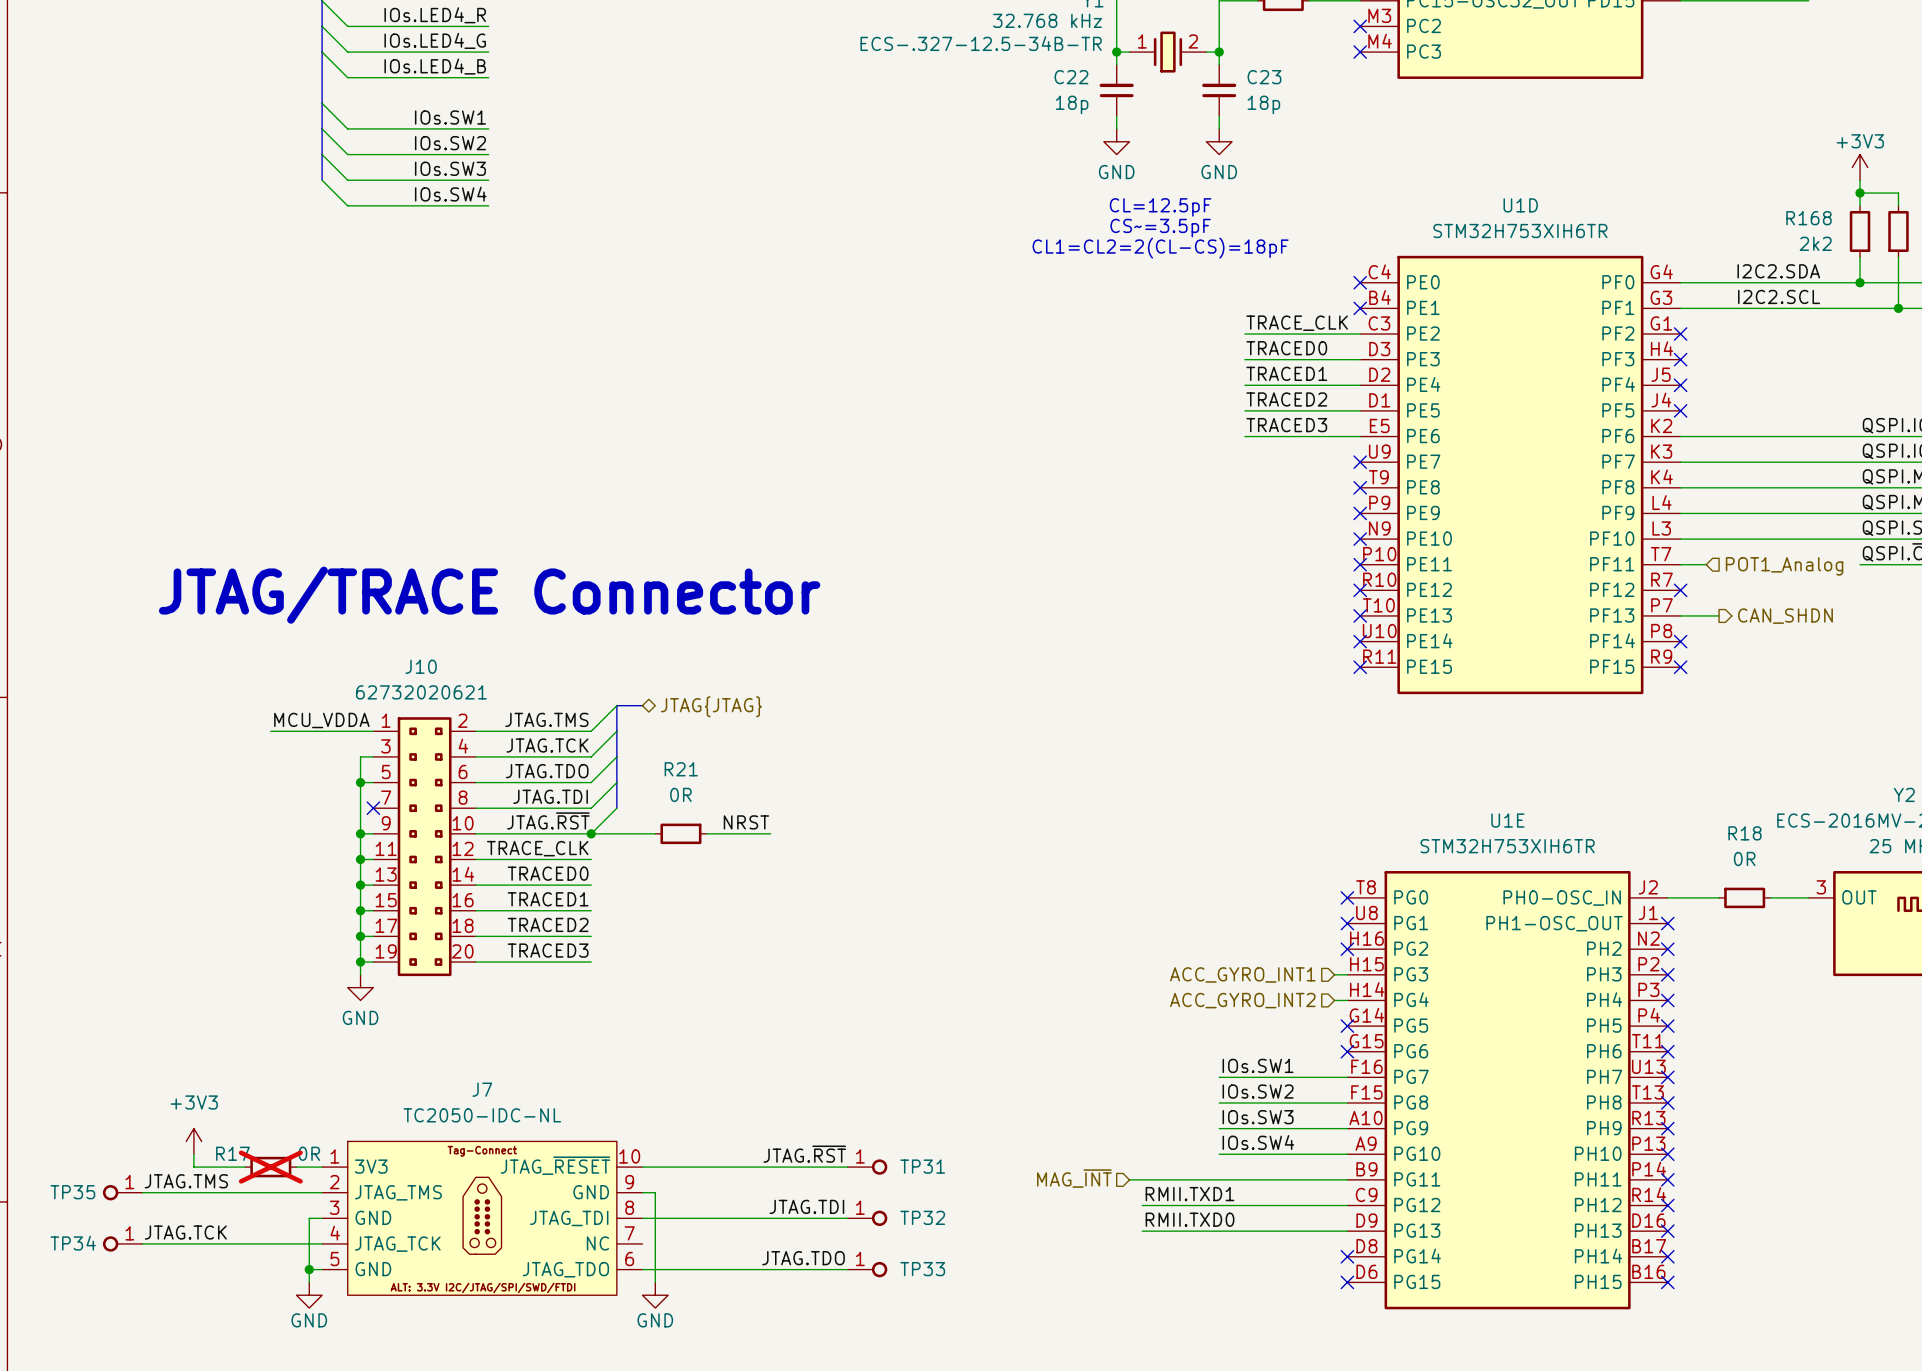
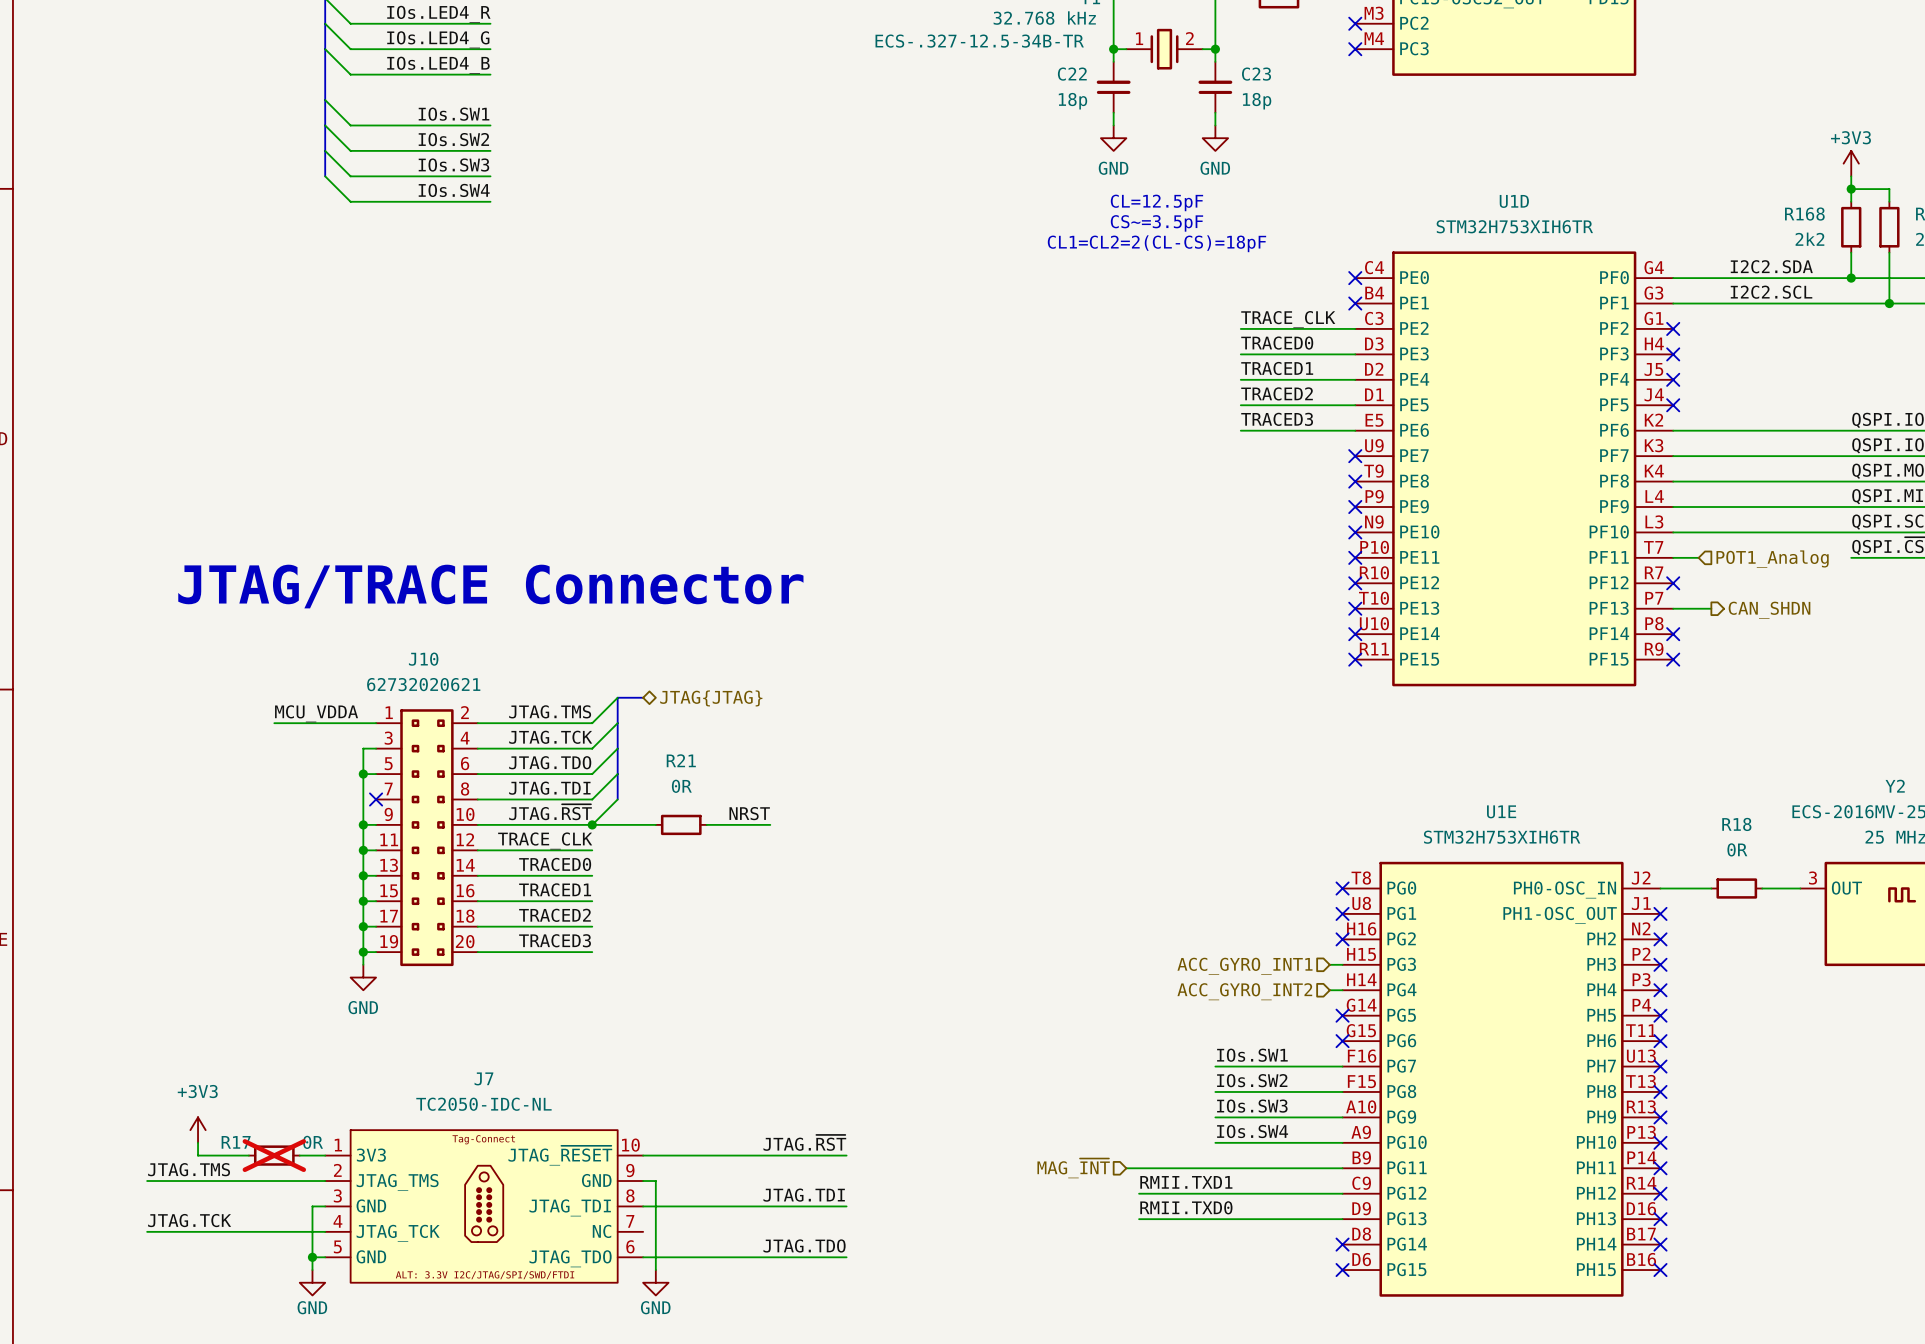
TP31: (867, 1167) -> none
TP35: (122, 1192) -> none
TP32: (867, 1218) -> none
TP34: (122, 1243) -> none
TP33: (867, 1269) -> none

